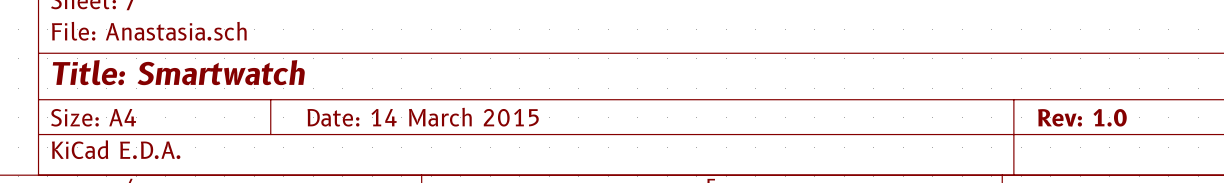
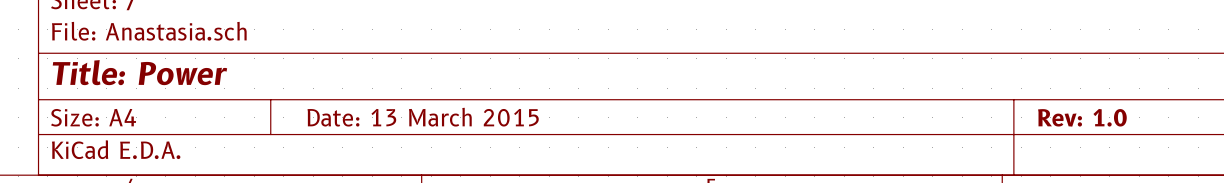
title block: Title: Smartwatch (178, 72) -> Title: Power (139, 72)
title block: Date: 14 March 2015 (423, 117) -> Date: 13 March 2015 (423, 117)

